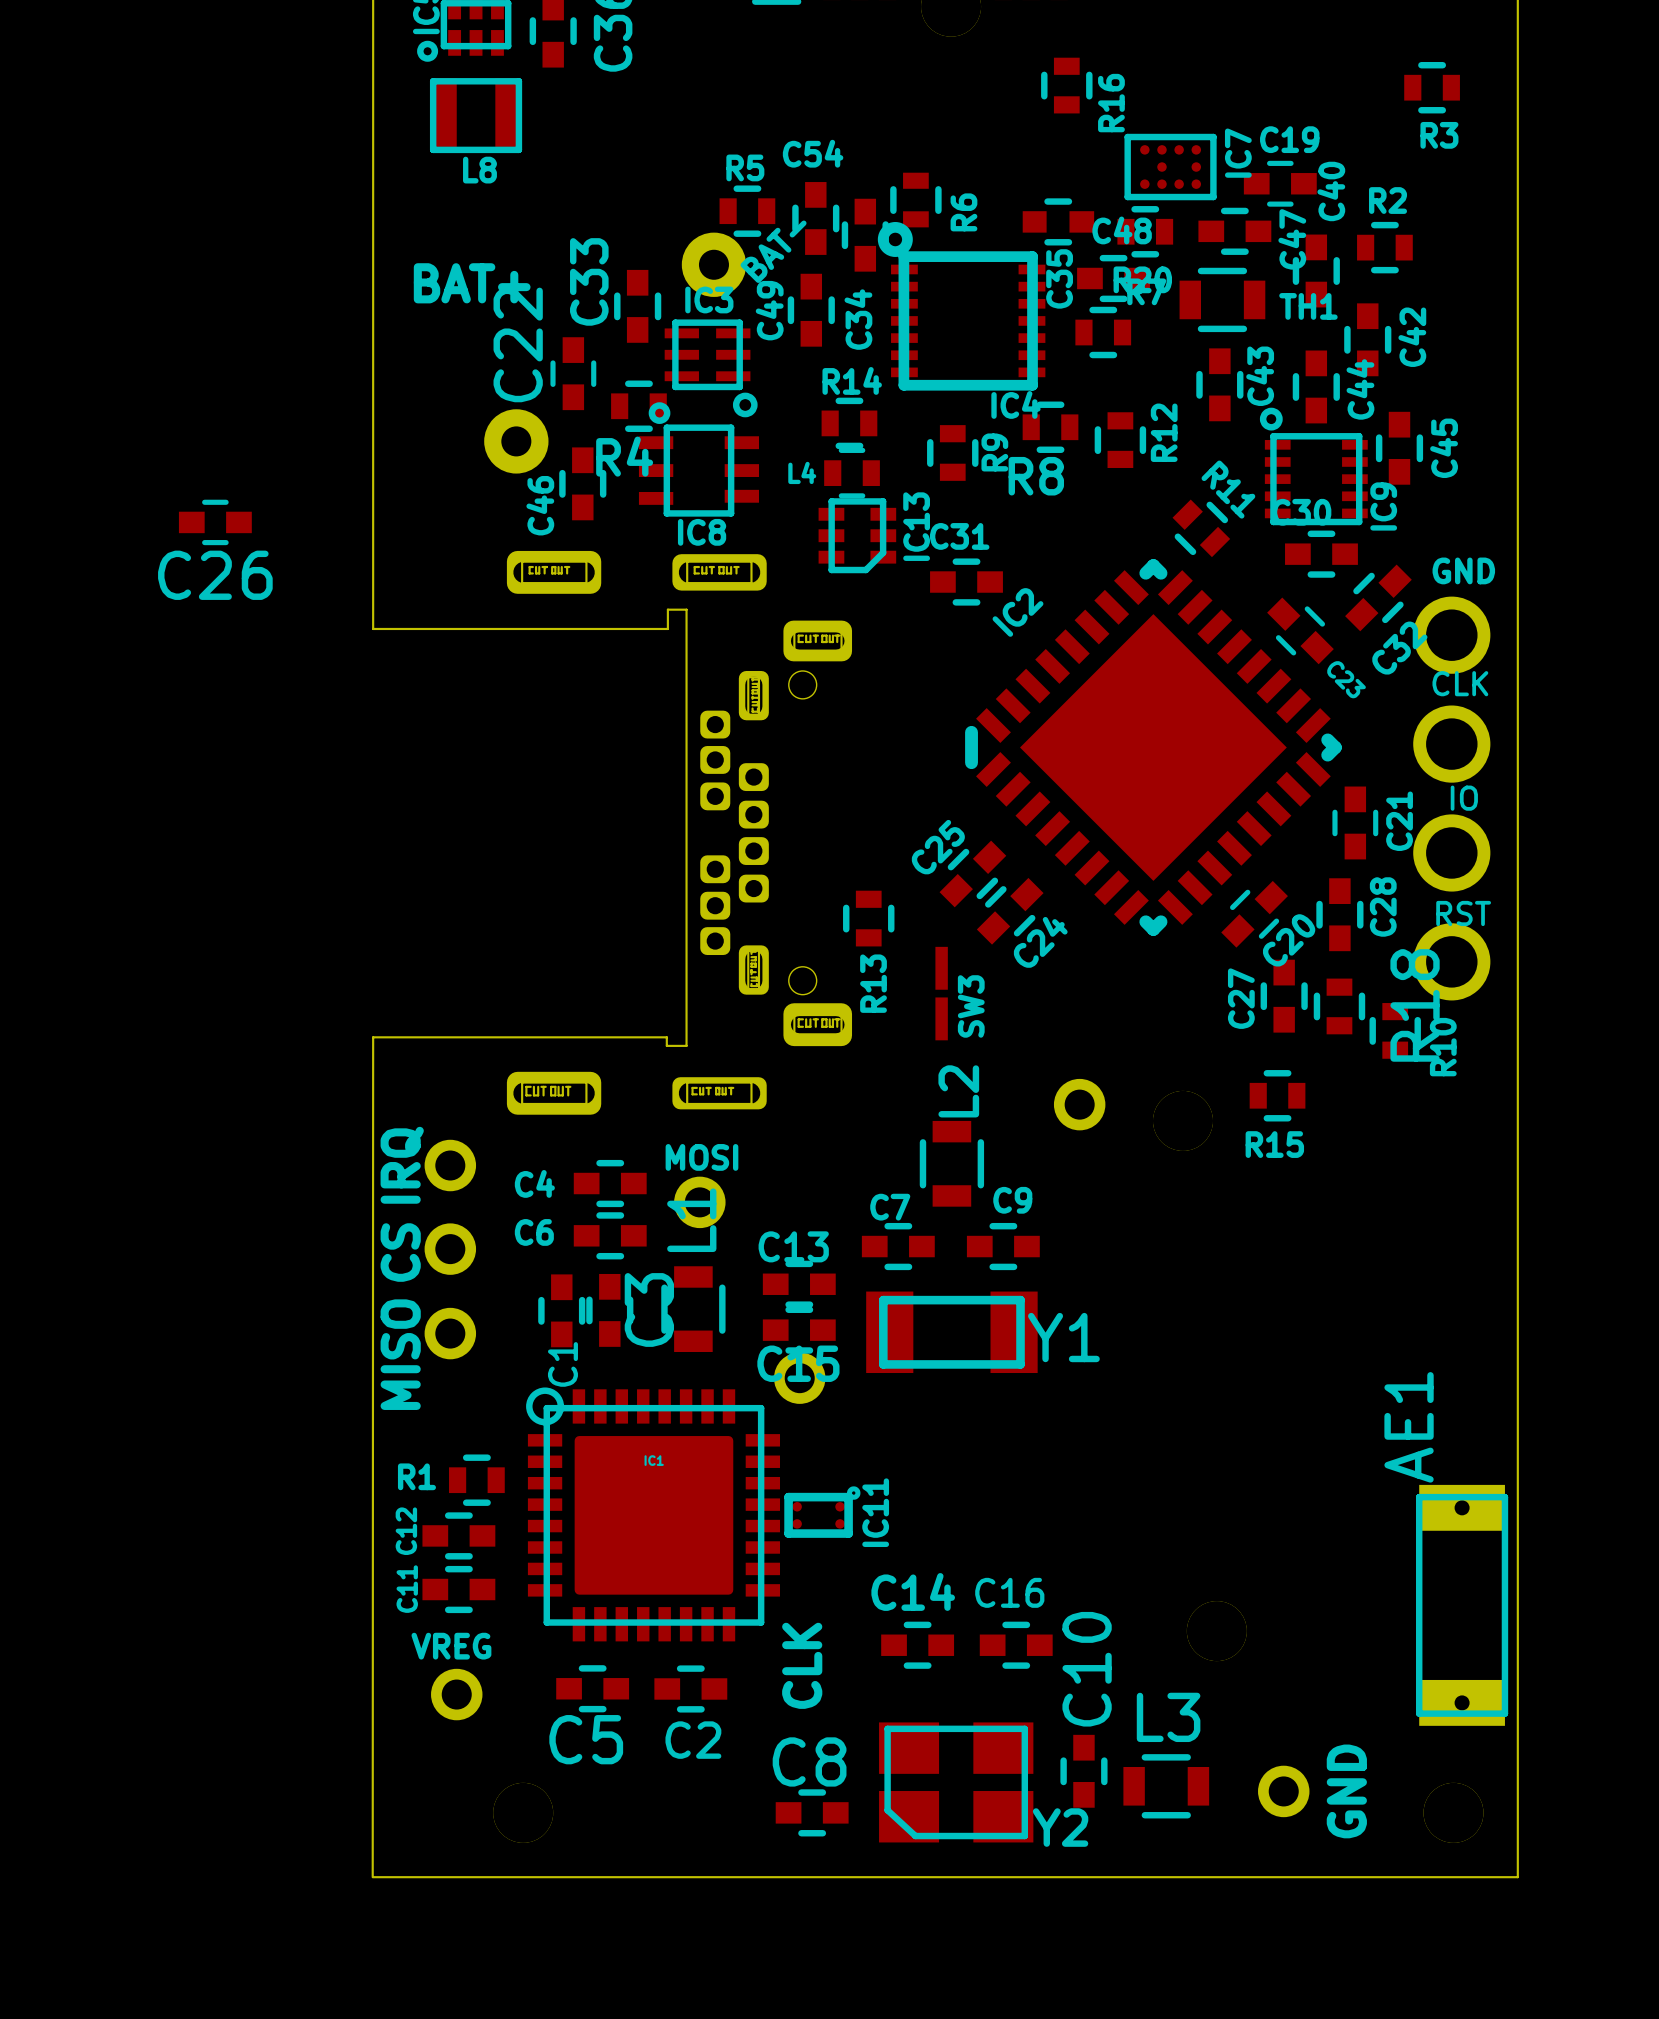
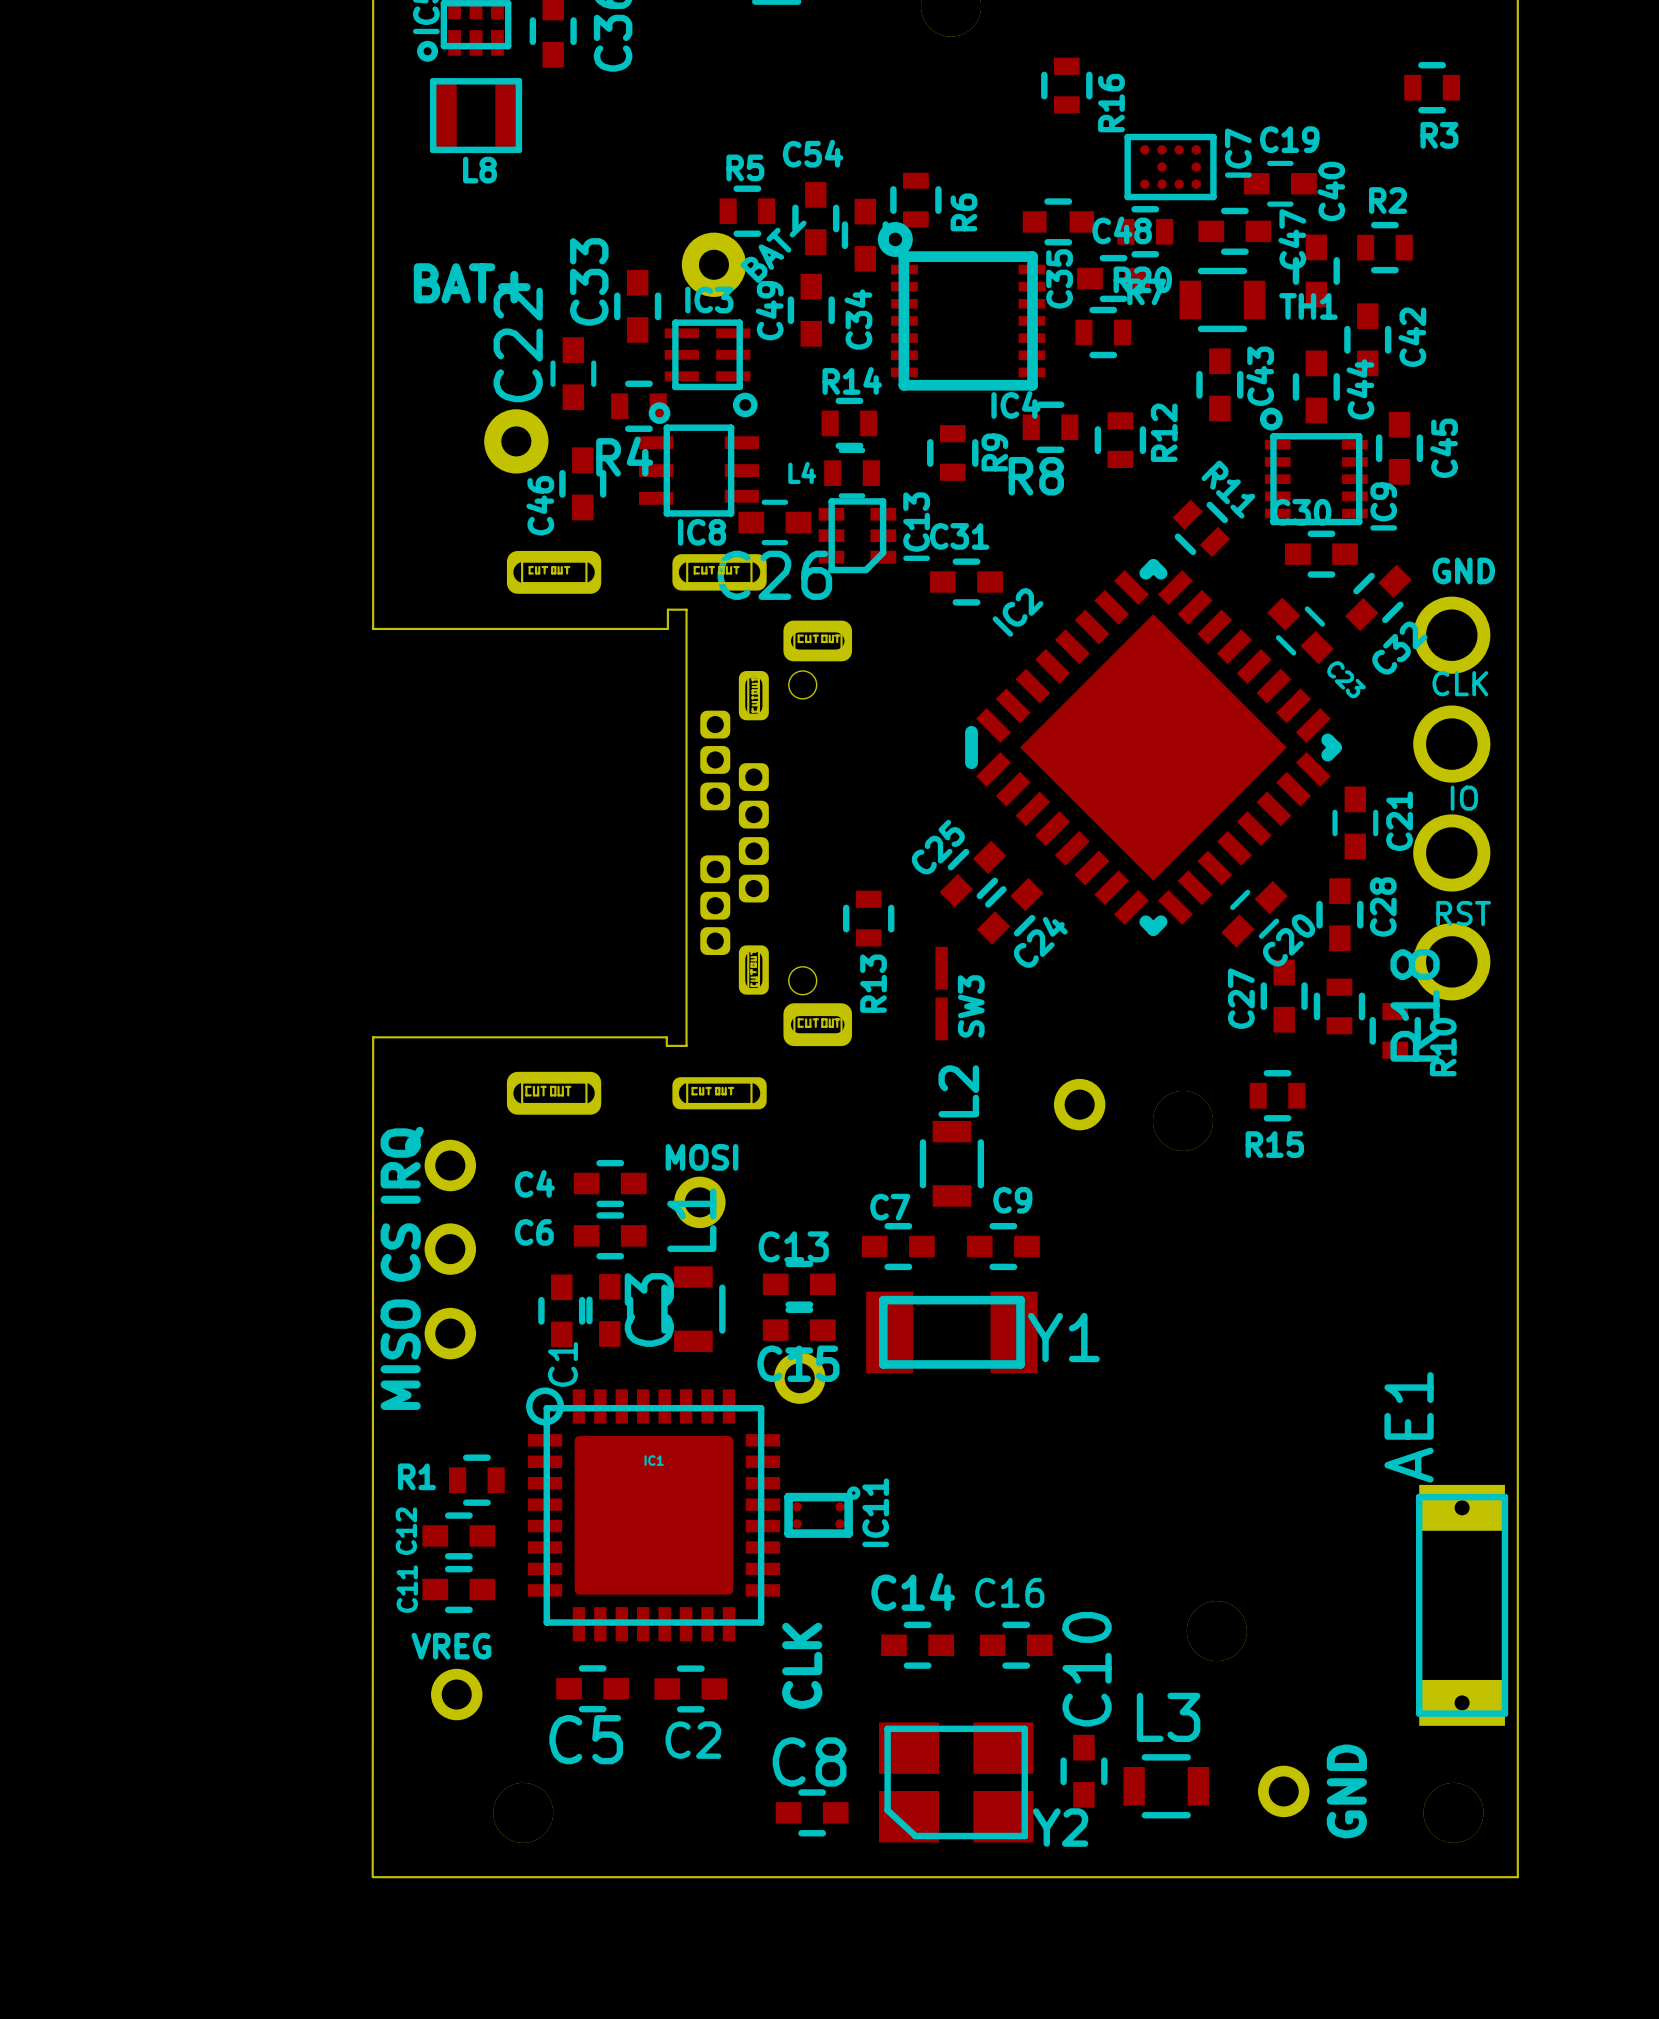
C26 position: (215, 522) -> (774, 522)

